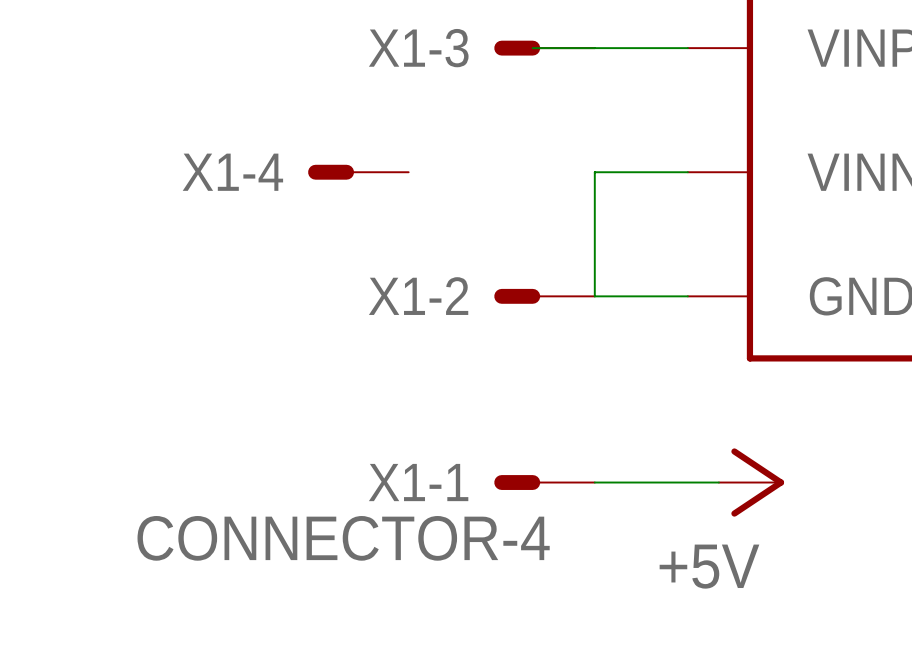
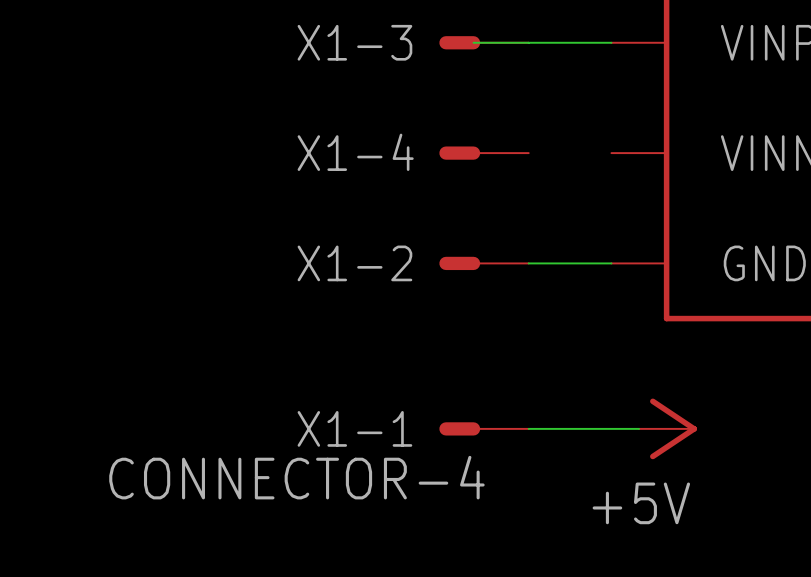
X1-4 position: (358, 172) -> (484, 153)
wire: (687, 172) (594, 172) (594, 296) -> none

